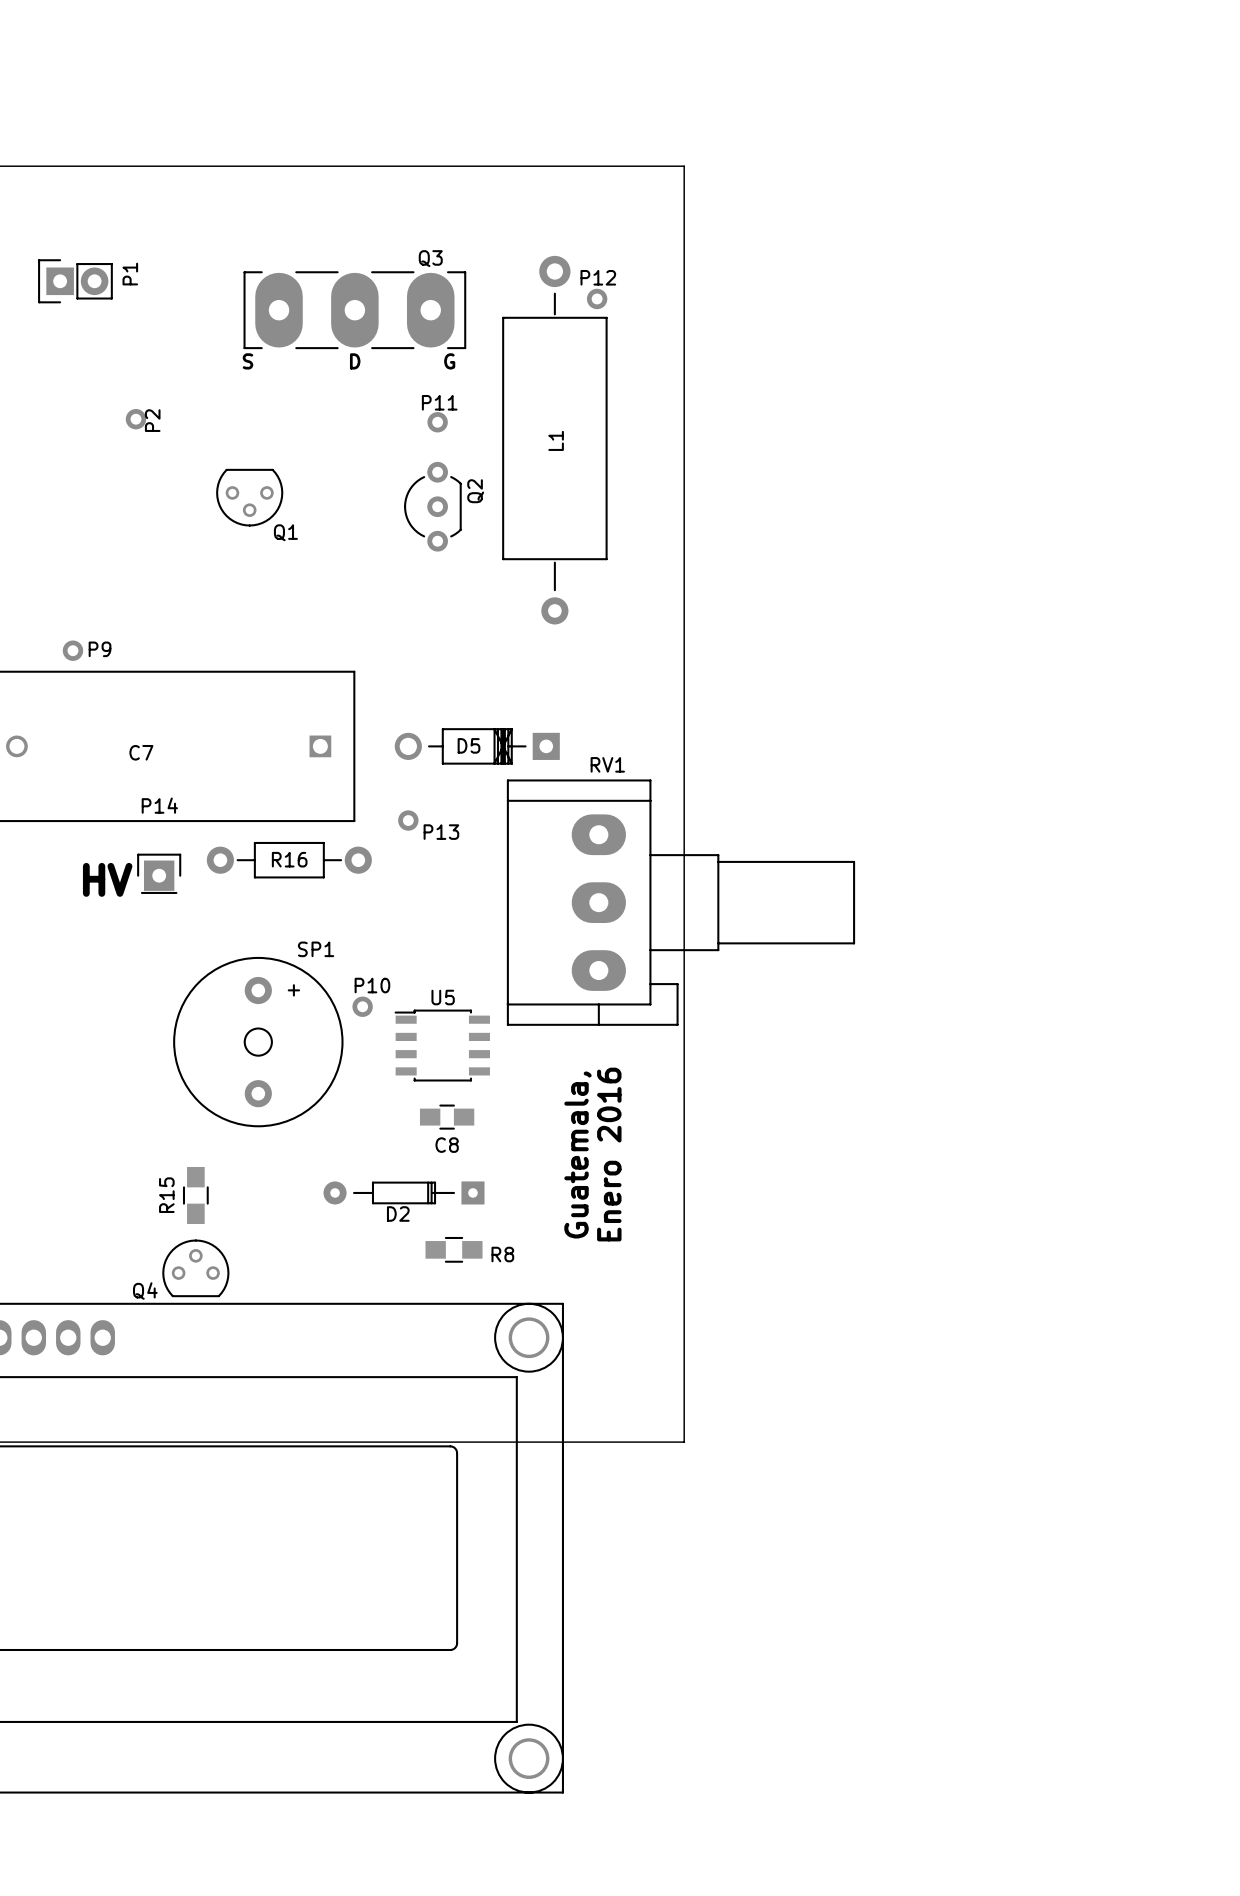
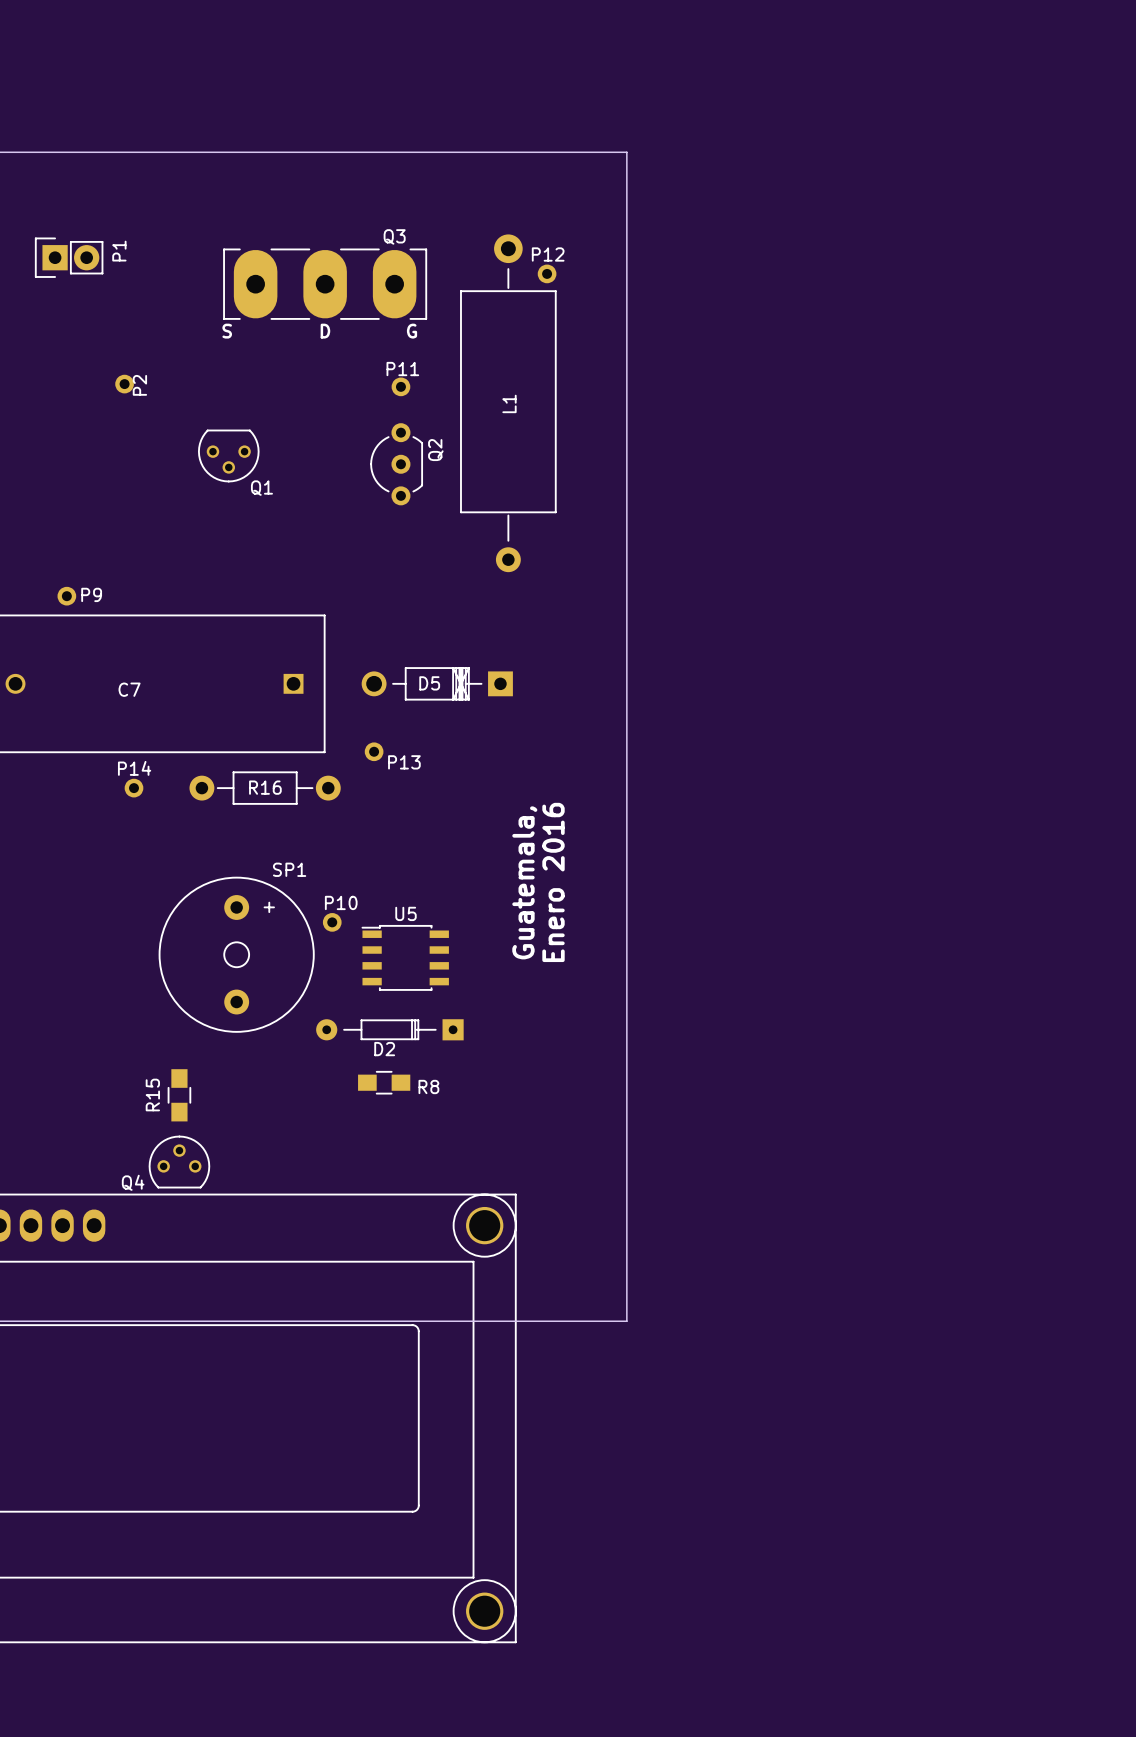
P14 name position: P14 (159, 805) -> P14 (134, 768)
P14 footprint: [137, 853, 182, 894] -> [124, 778, 144, 798]
text: HV (107, 879) -> none
RV1: (680, 902) -> none
C8: (447, 1117) -> none
text position: Enero 2016 (609, 1154) -> Enero 2016 (553, 882)
text position: Guatemala, (577, 1155) -> Guatemala, (524, 882)
D2 position: (404, 1192) -> (389, 1029)
R8 position: (454, 1249) -> (384, 1082)

